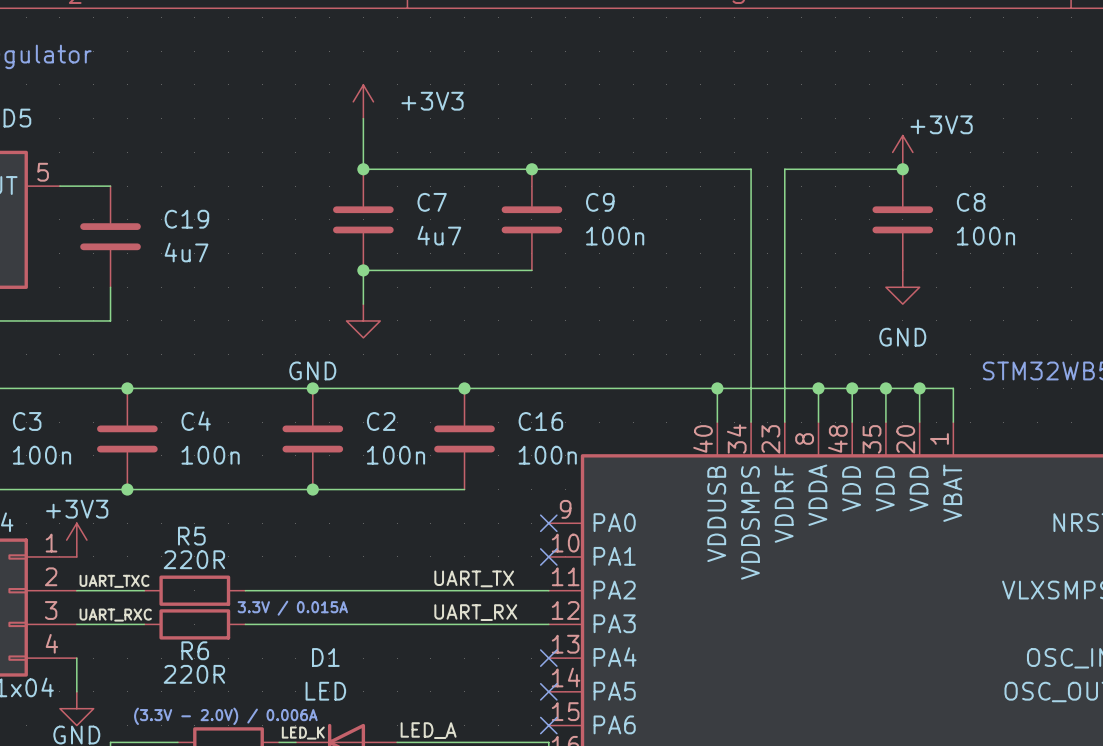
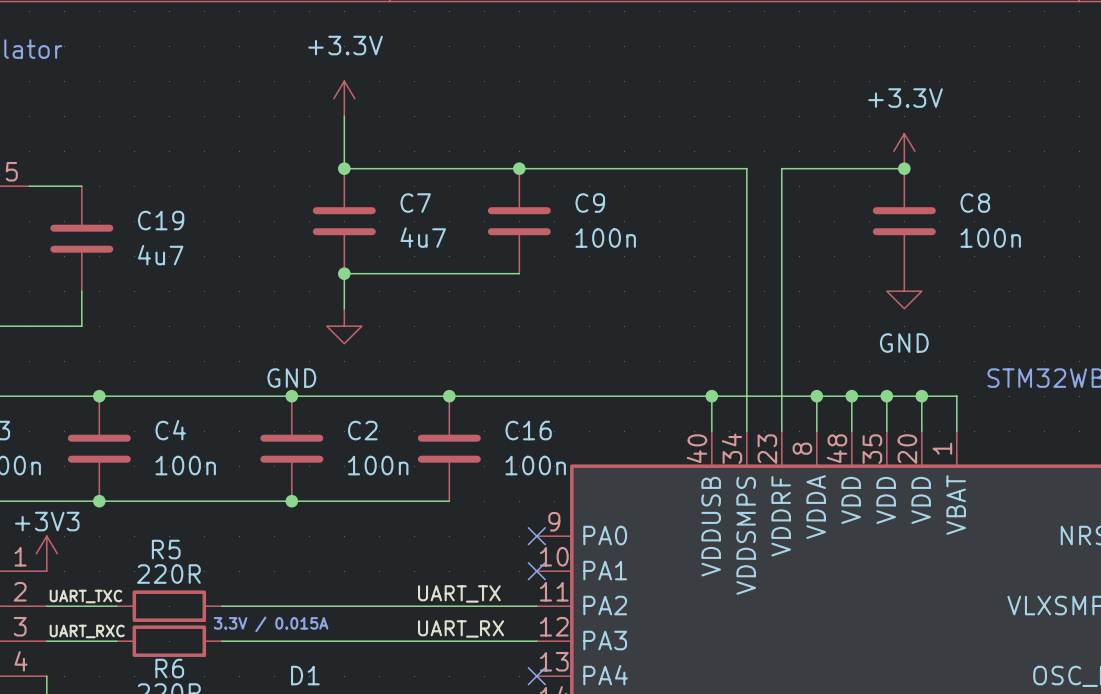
power symbol: +3V3 (363, 101) -> +3.3V (344, 98)
power symbol: +3V3 (902, 152) -> +3.3V (904, 151)

